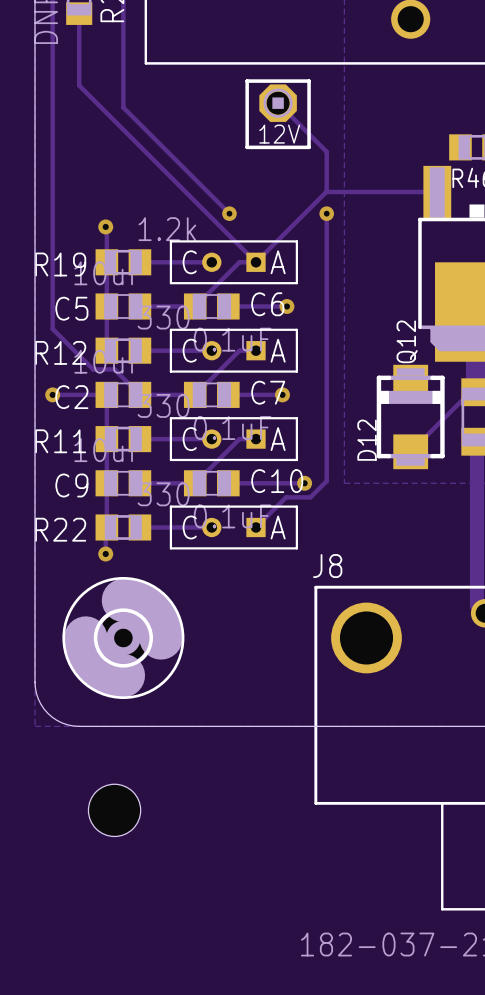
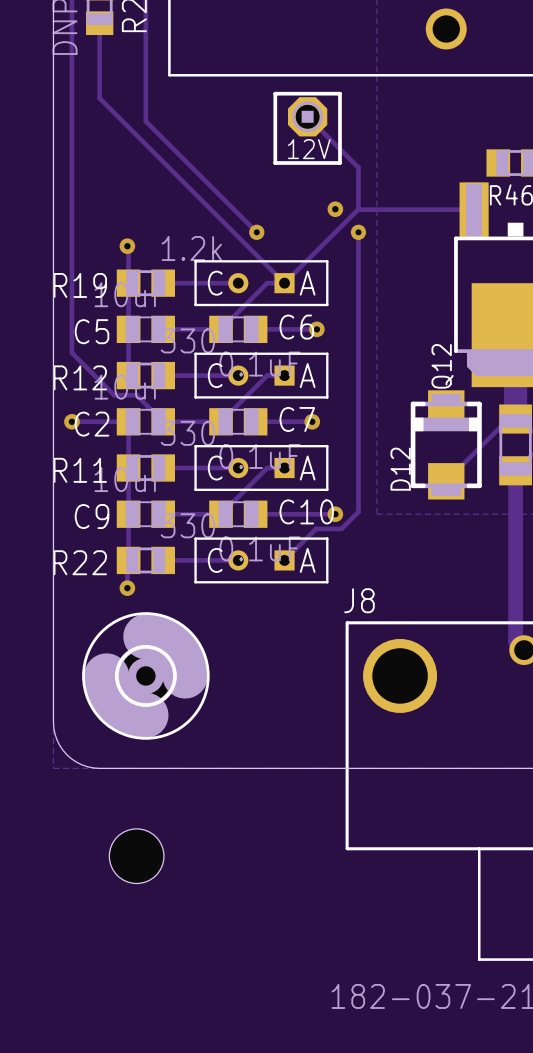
via: none -> (335, 209)

